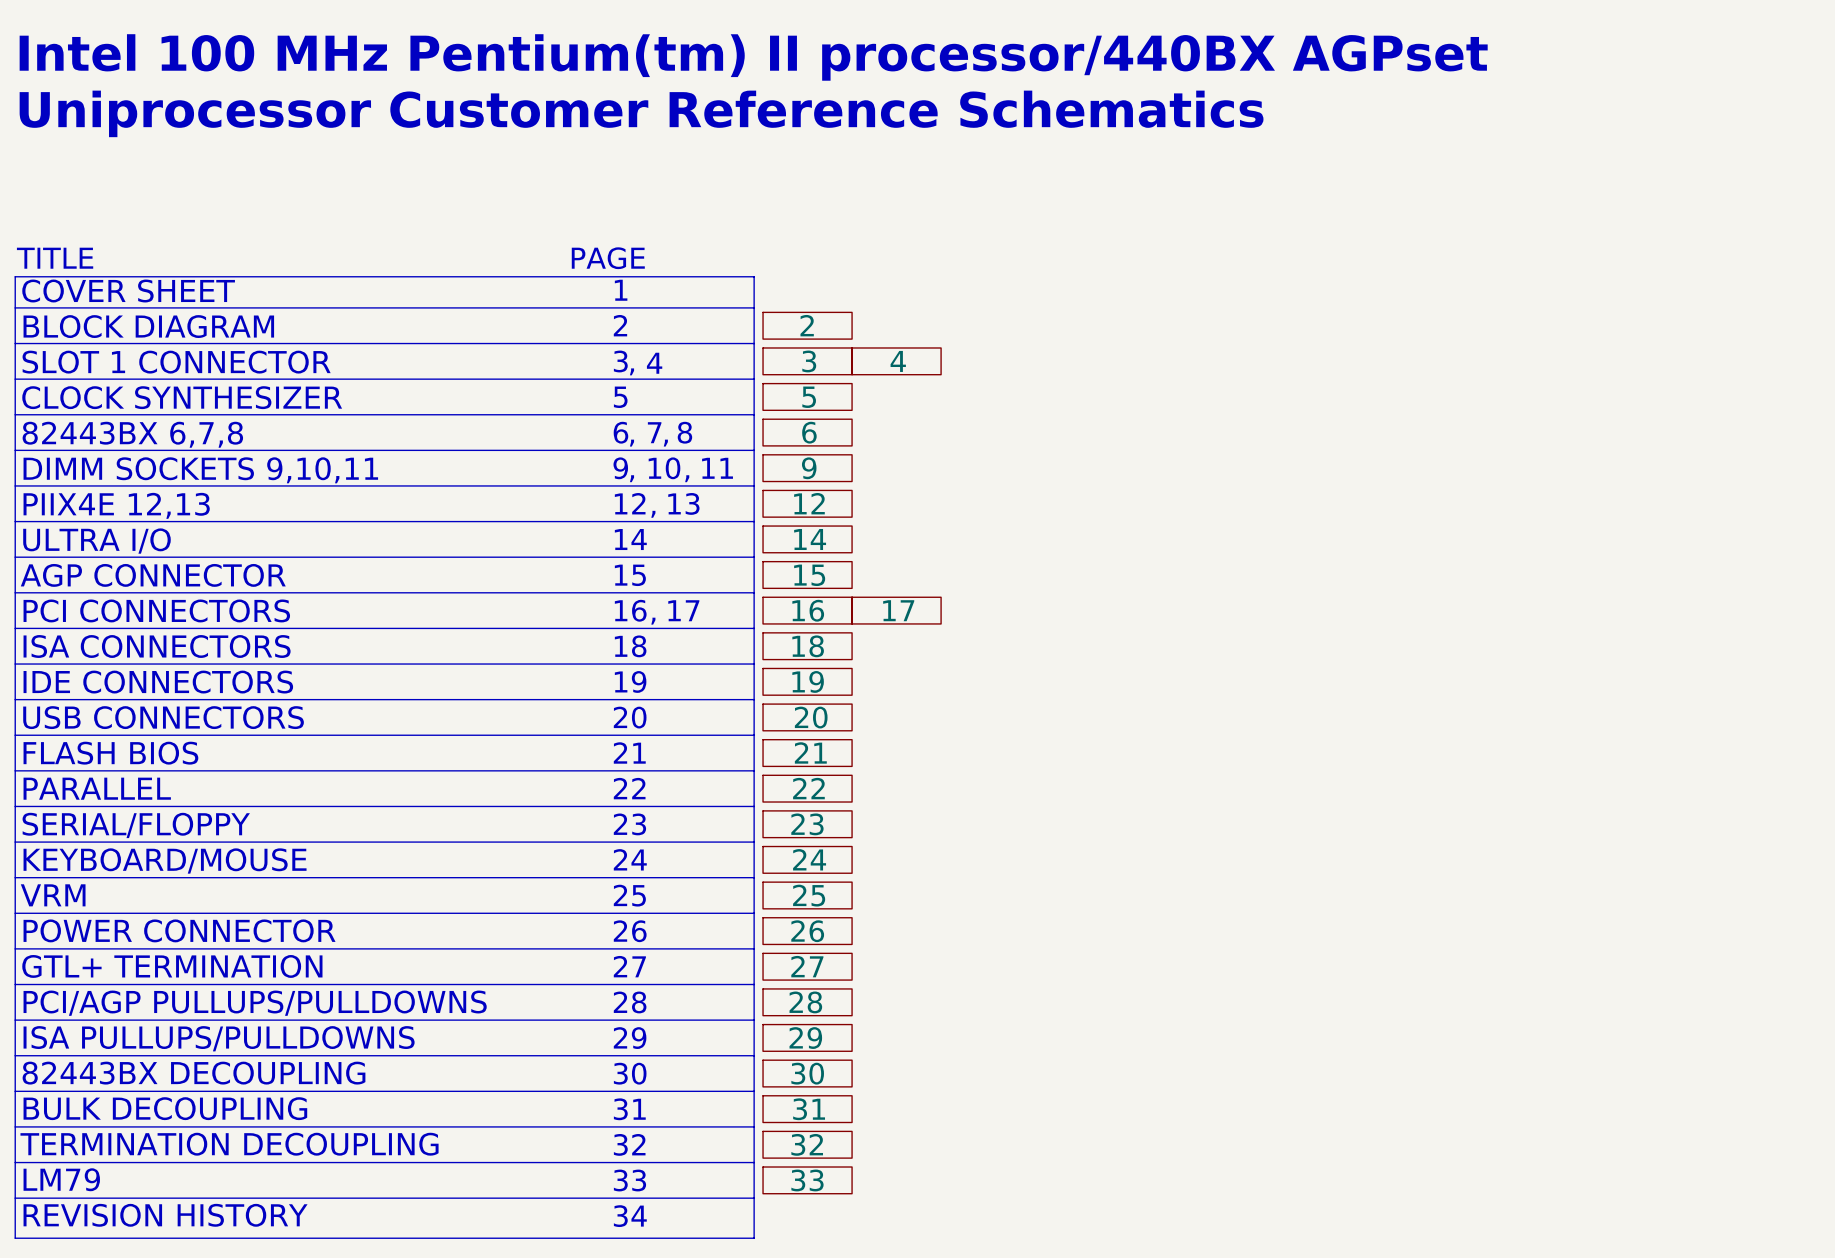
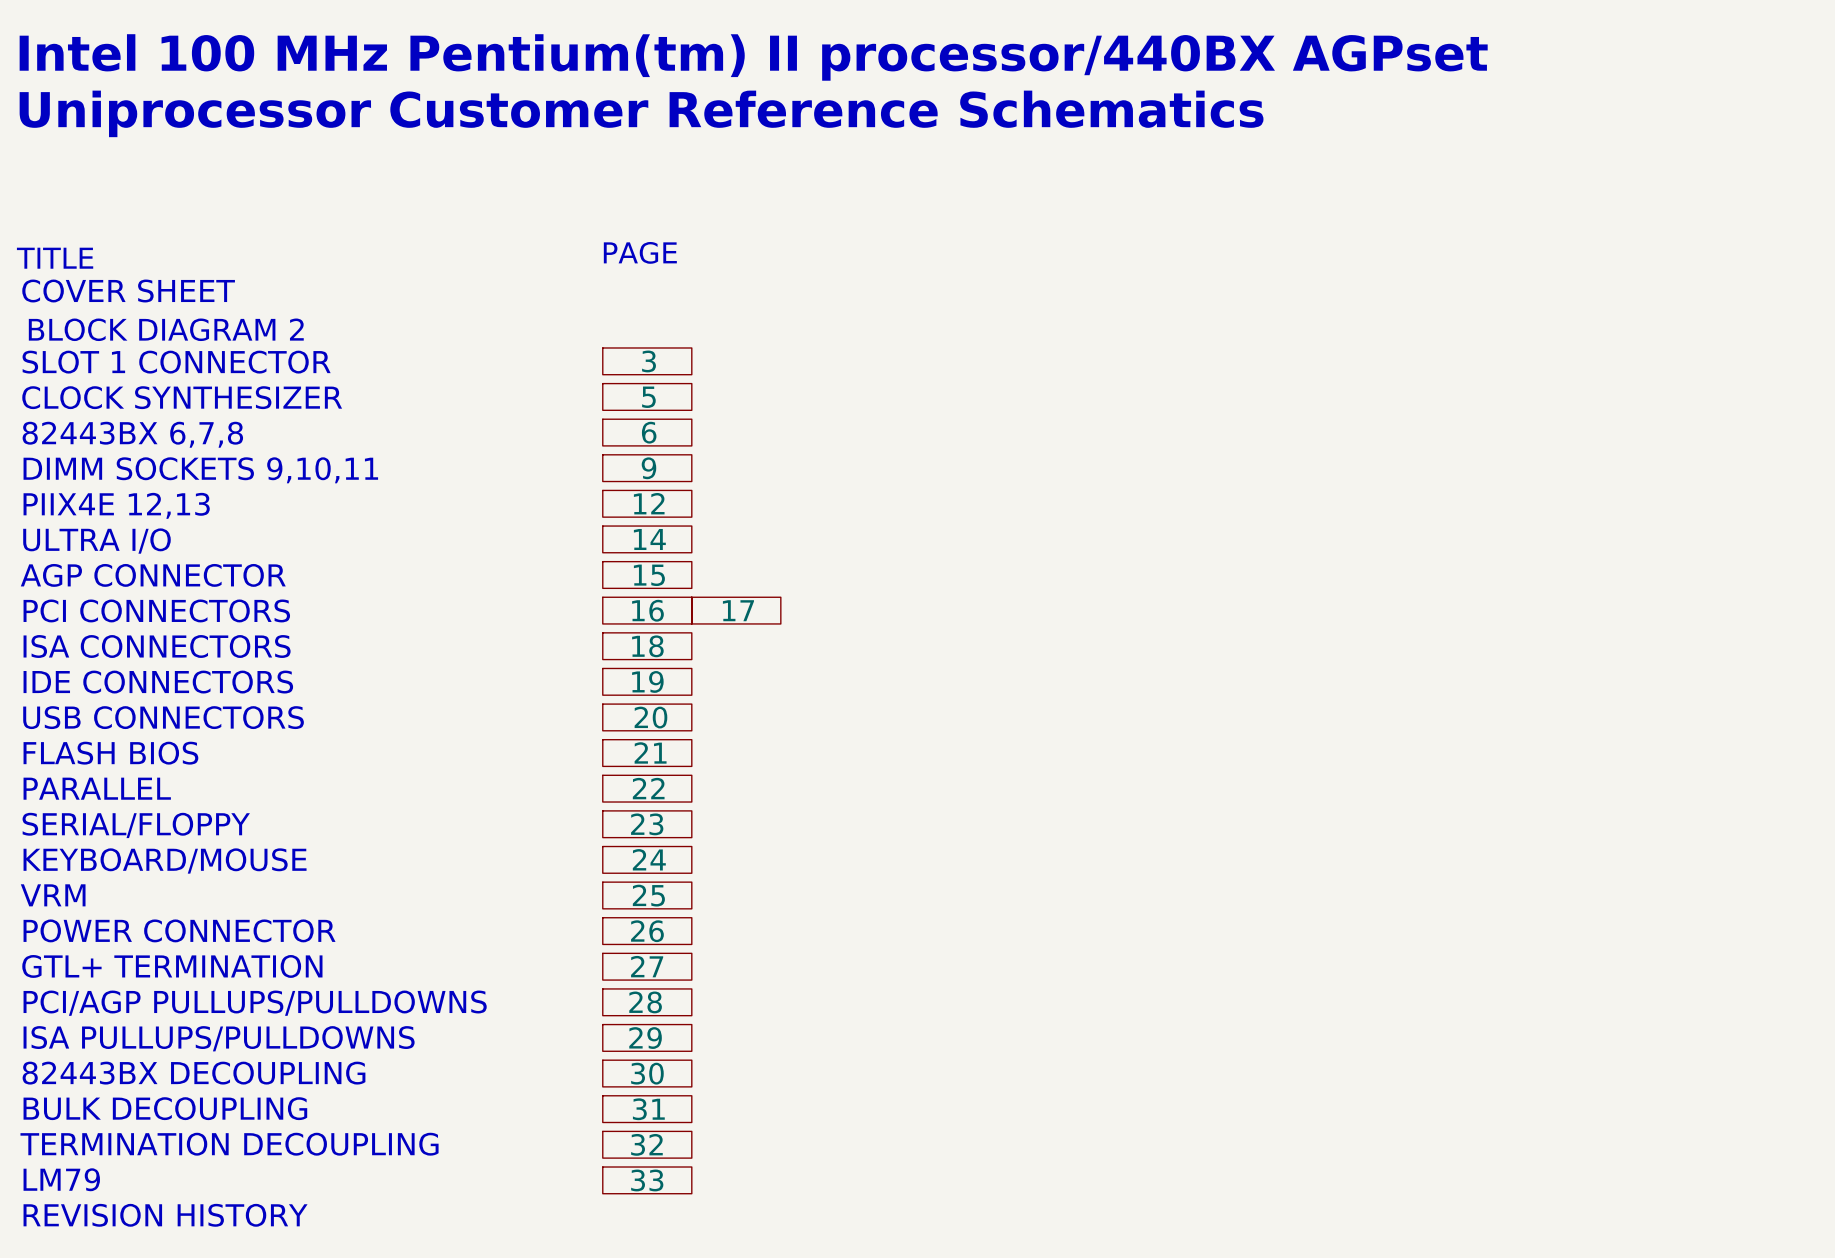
text position: PAGE (608, 258) -> PAGE (640, 252)
line: (15, 276) (754, 276) (754, 1238) (15, 1238) (15, 276) -> none
text: 1 (621, 290) -> none
line: (15, 307) (754, 307) -> none
text: 2 (620, 325) -> none
sheet: (807, 325) -> none
text: BLOCK DIAGRAM (148, 326) -> BLOCK DIAGRAM 2 (166, 329)
line: (15, 343) (754, 343) -> none
text: 3 (620, 361) -> none
sheet position: (807, 361) -> (647, 361)
sheet: (896, 361) -> none
text: 4 (654, 363) -> none
text: , (632, 371) -> none
line: (15, 379) (754, 379) -> none
sheet position: (807, 396) -> (647, 396)
text: 5 (620, 397) -> none
line: (15, 414) (754, 414) -> none
text: 6 (620, 432) -> none
text: 7 (654, 432) -> none
text: 8 (684, 432) -> none
sheet position: (807, 432) -> (647, 432)
text: , (632, 443) -> none
text: , (665, 443) -> none
line: (15, 450) (754, 450) -> none
text: 9 (620, 468) -> none
text: 10 (664, 468) -> none
text: 11 (717, 468) -> none
sheet position: (807, 468) -> (647, 468)
text: , (632, 478) -> none
text: , (687, 478) -> none
line: (15, 485) (754, 485) -> none
text: 12 (630, 503) -> none
text: 13 (683, 503) -> none
sheet position: (807, 503) -> (647, 503)
text: , (653, 514) -> none
line: (15, 521) (754, 521) -> none
text: 14 (630, 539) -> none
sheet position: (807, 539) -> (647, 539)
line: (15, 557) (754, 557) -> none
text: 15 (630, 575) -> none
sheet position: (807, 575) -> (647, 575)
line: (15, 592) (754, 592) -> none
text: 16 (630, 610) -> none
text: 17 (683, 610) -> none
sheet position: (807, 610) -> (647, 610)
sheet position: (896, 610) -> (736, 610)
text: , (653, 621) -> none
line: (15, 628) (754, 628) -> none
text: 18 (630, 646) -> none
sheet position: (807, 646) -> (647, 646)
line: (15, 664) (754, 664) -> none
text: 19 (630, 681) -> none
sheet position: (807, 681) -> (647, 681)
line: (15, 699) (754, 699) -> none
text: 20 (630, 717) -> none
sheet position: (807, 717) -> (647, 717)
line: (15, 735) (754, 735) -> none
text: 21 (629, 752) -> none
sheet position: (807, 753) -> (647, 753)
line: (15, 770) (754, 770) -> none
text: 22 (629, 788) -> none
sheet position: (807, 788) -> (647, 788)
line: (15, 806) (754, 806) -> none
text: 23 (629, 824) -> none
sheet position: (807, 824) -> (647, 824)
line: (15, 842) (754, 842) -> none
text: 24 (630, 859) -> none
sheet position: (807, 859) -> (647, 859)
line: (15, 877) (754, 877) -> none
text: 25 (629, 895) -> none
sheet position: (807, 895) -> (647, 895)
line: (15, 913) (754, 913) -> none
text: 26 (630, 931) -> none
sheet position: (807, 931) -> (647, 931)
line: (15, 948) (754, 948) -> none
text: 27 (629, 966) -> none
sheet position: (807, 966) -> (647, 966)
line: (15, 984) (754, 984) -> none
text: 28 (630, 1002) -> none
sheet position: (807, 1002) -> (647, 1002)
line: (15, 1020) (754, 1020) -> none
sheet position: (807, 1037) -> (647, 1037)
text: 29 (630, 1038) -> none
line: (15, 1055) (754, 1055) -> none
text: 30 (630, 1073) -> none
sheet position: (807, 1073) -> (647, 1073)
line: (15, 1091) (754, 1091) -> none
text: 31 (629, 1109) -> none
sheet position: (807, 1109) -> (647, 1109)
line: (15, 1126) (754, 1126) -> none
text: 32 (629, 1144) -> none
sheet position: (807, 1144) -> (647, 1144)
line: (15, 1162) (754, 1162) -> none
text: 33 (629, 1180) -> none
sheet position: (807, 1180) -> (647, 1180)
line: (15, 1198) (754, 1198) -> none
text: 34 (630, 1216) -> none

